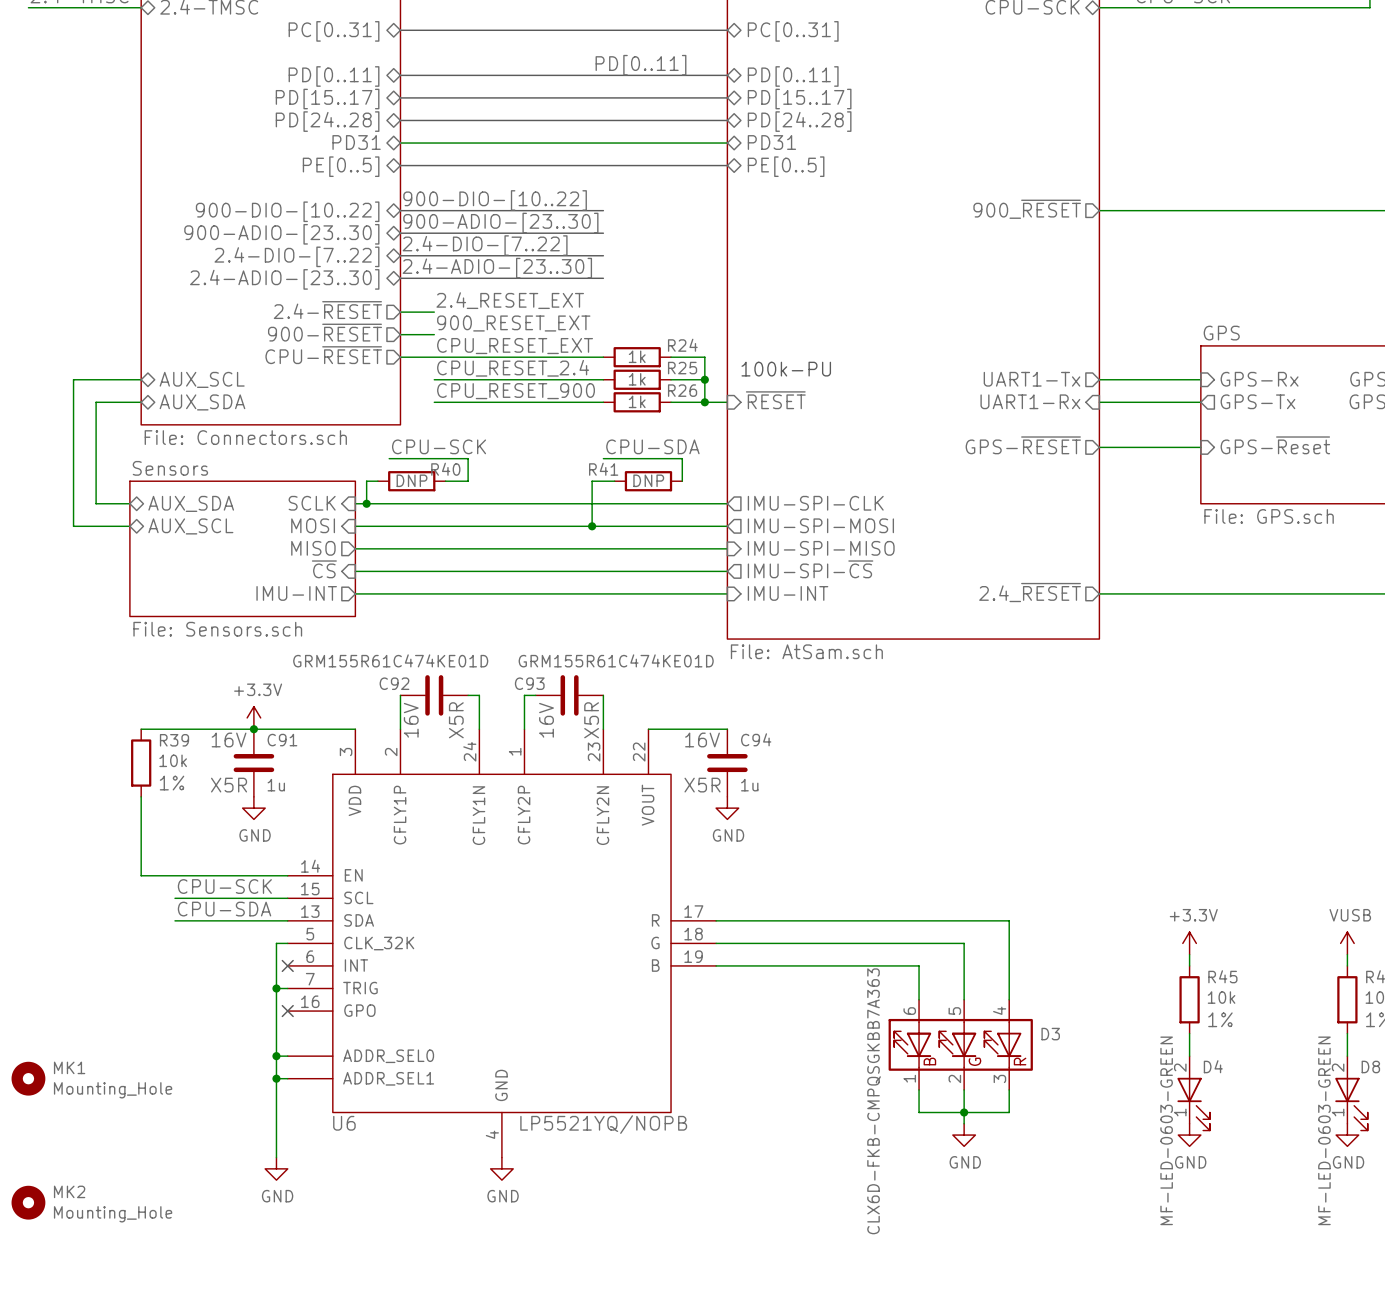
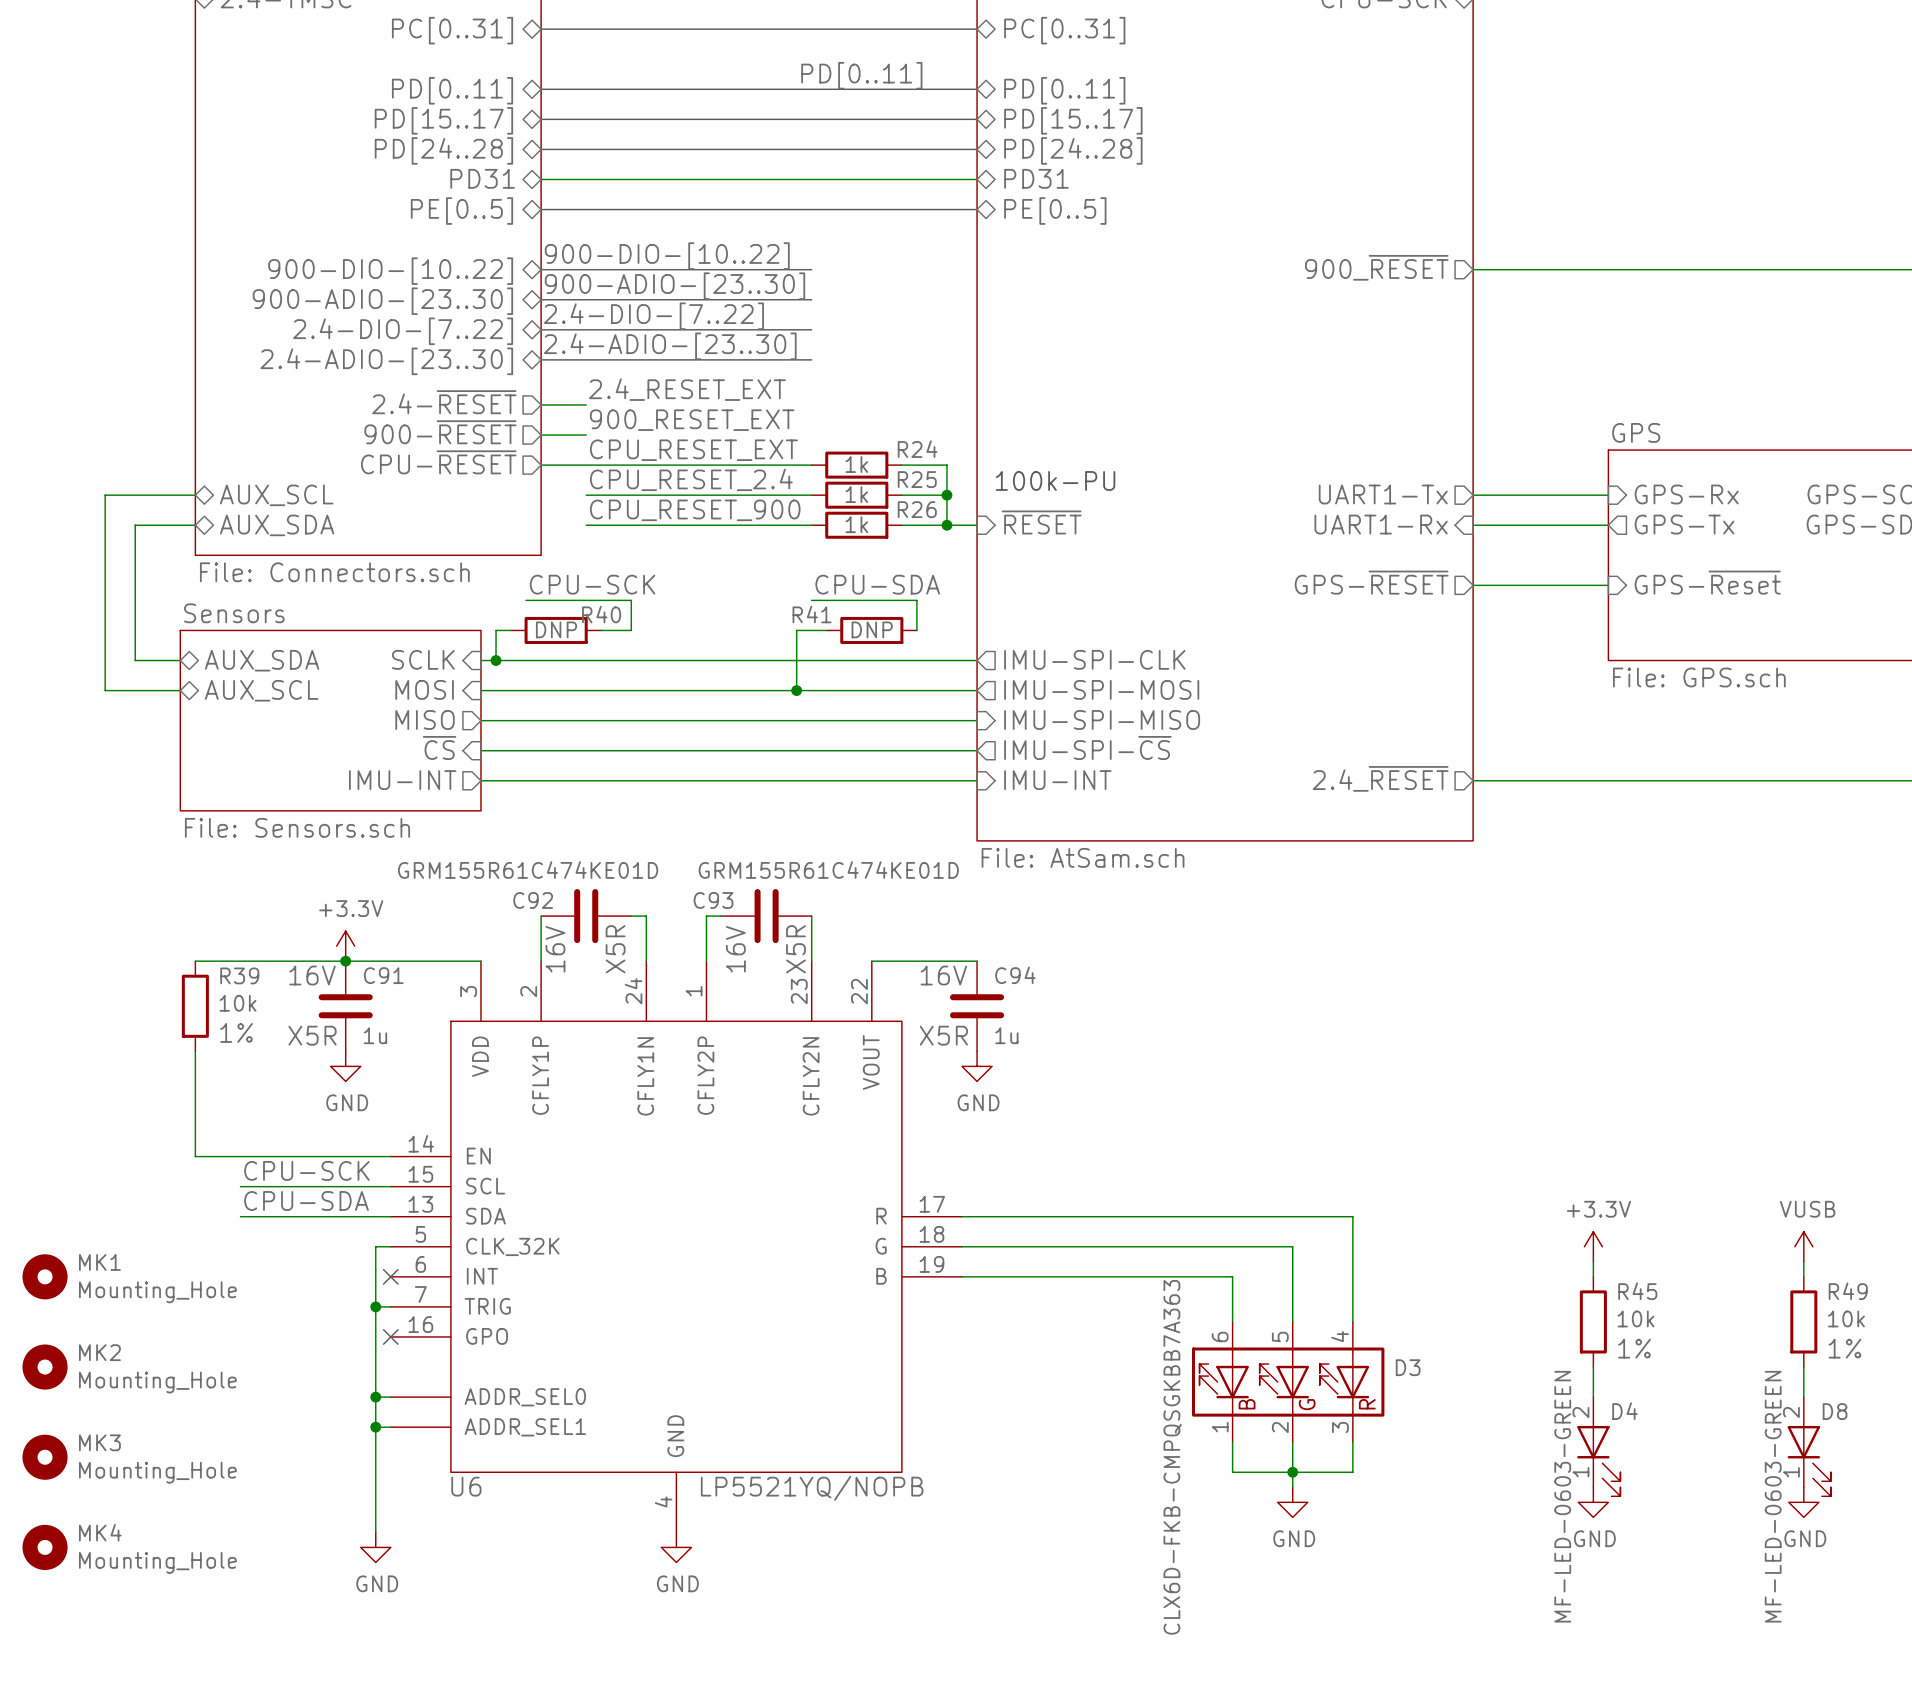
MK1 position: (28, 1078) -> (45, 1276)
MK3: none -> Mounting_Hole (45, 1457)
MK4: none -> Mounting_Hole (45, 1547)
MK2 position: (28, 1202) -> (45, 1367)

